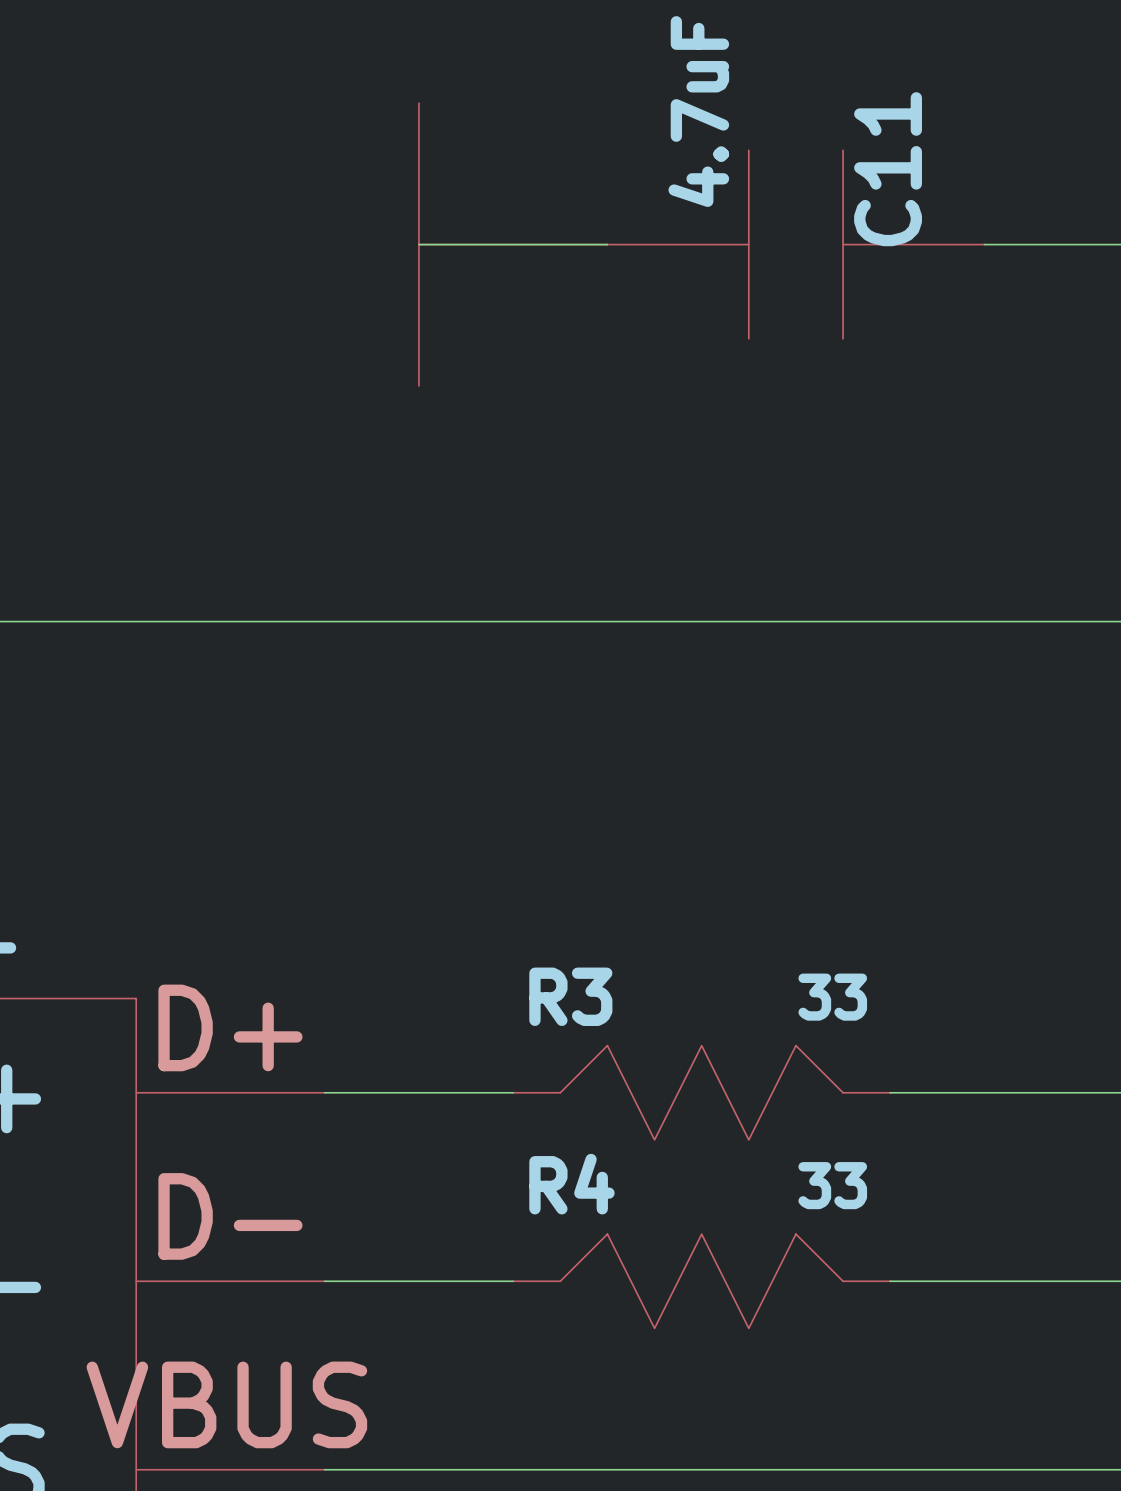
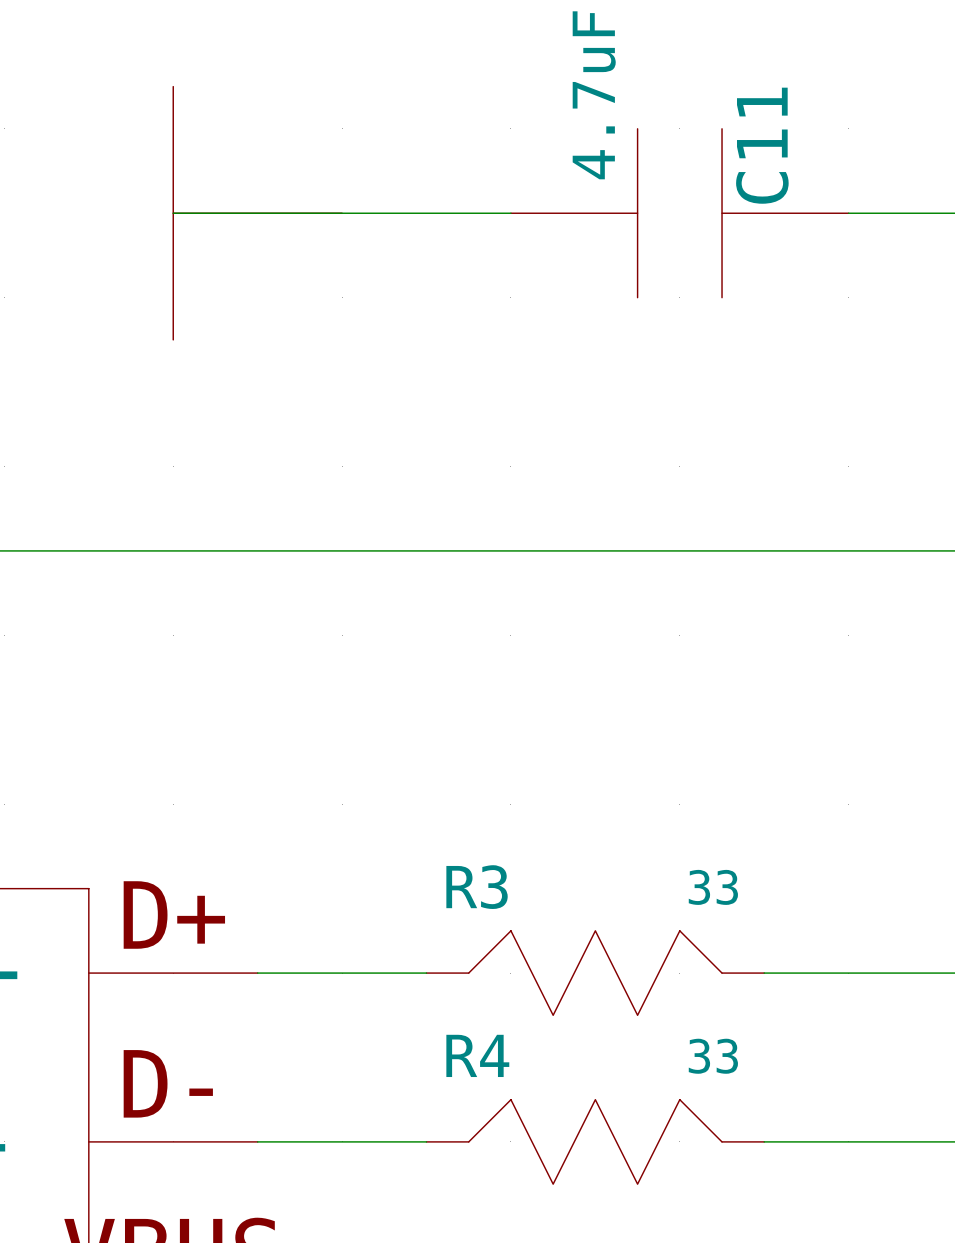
wire: none -> (173, 213) (342, 213)
power symbol position: (513, 244) -> (257, 213)

